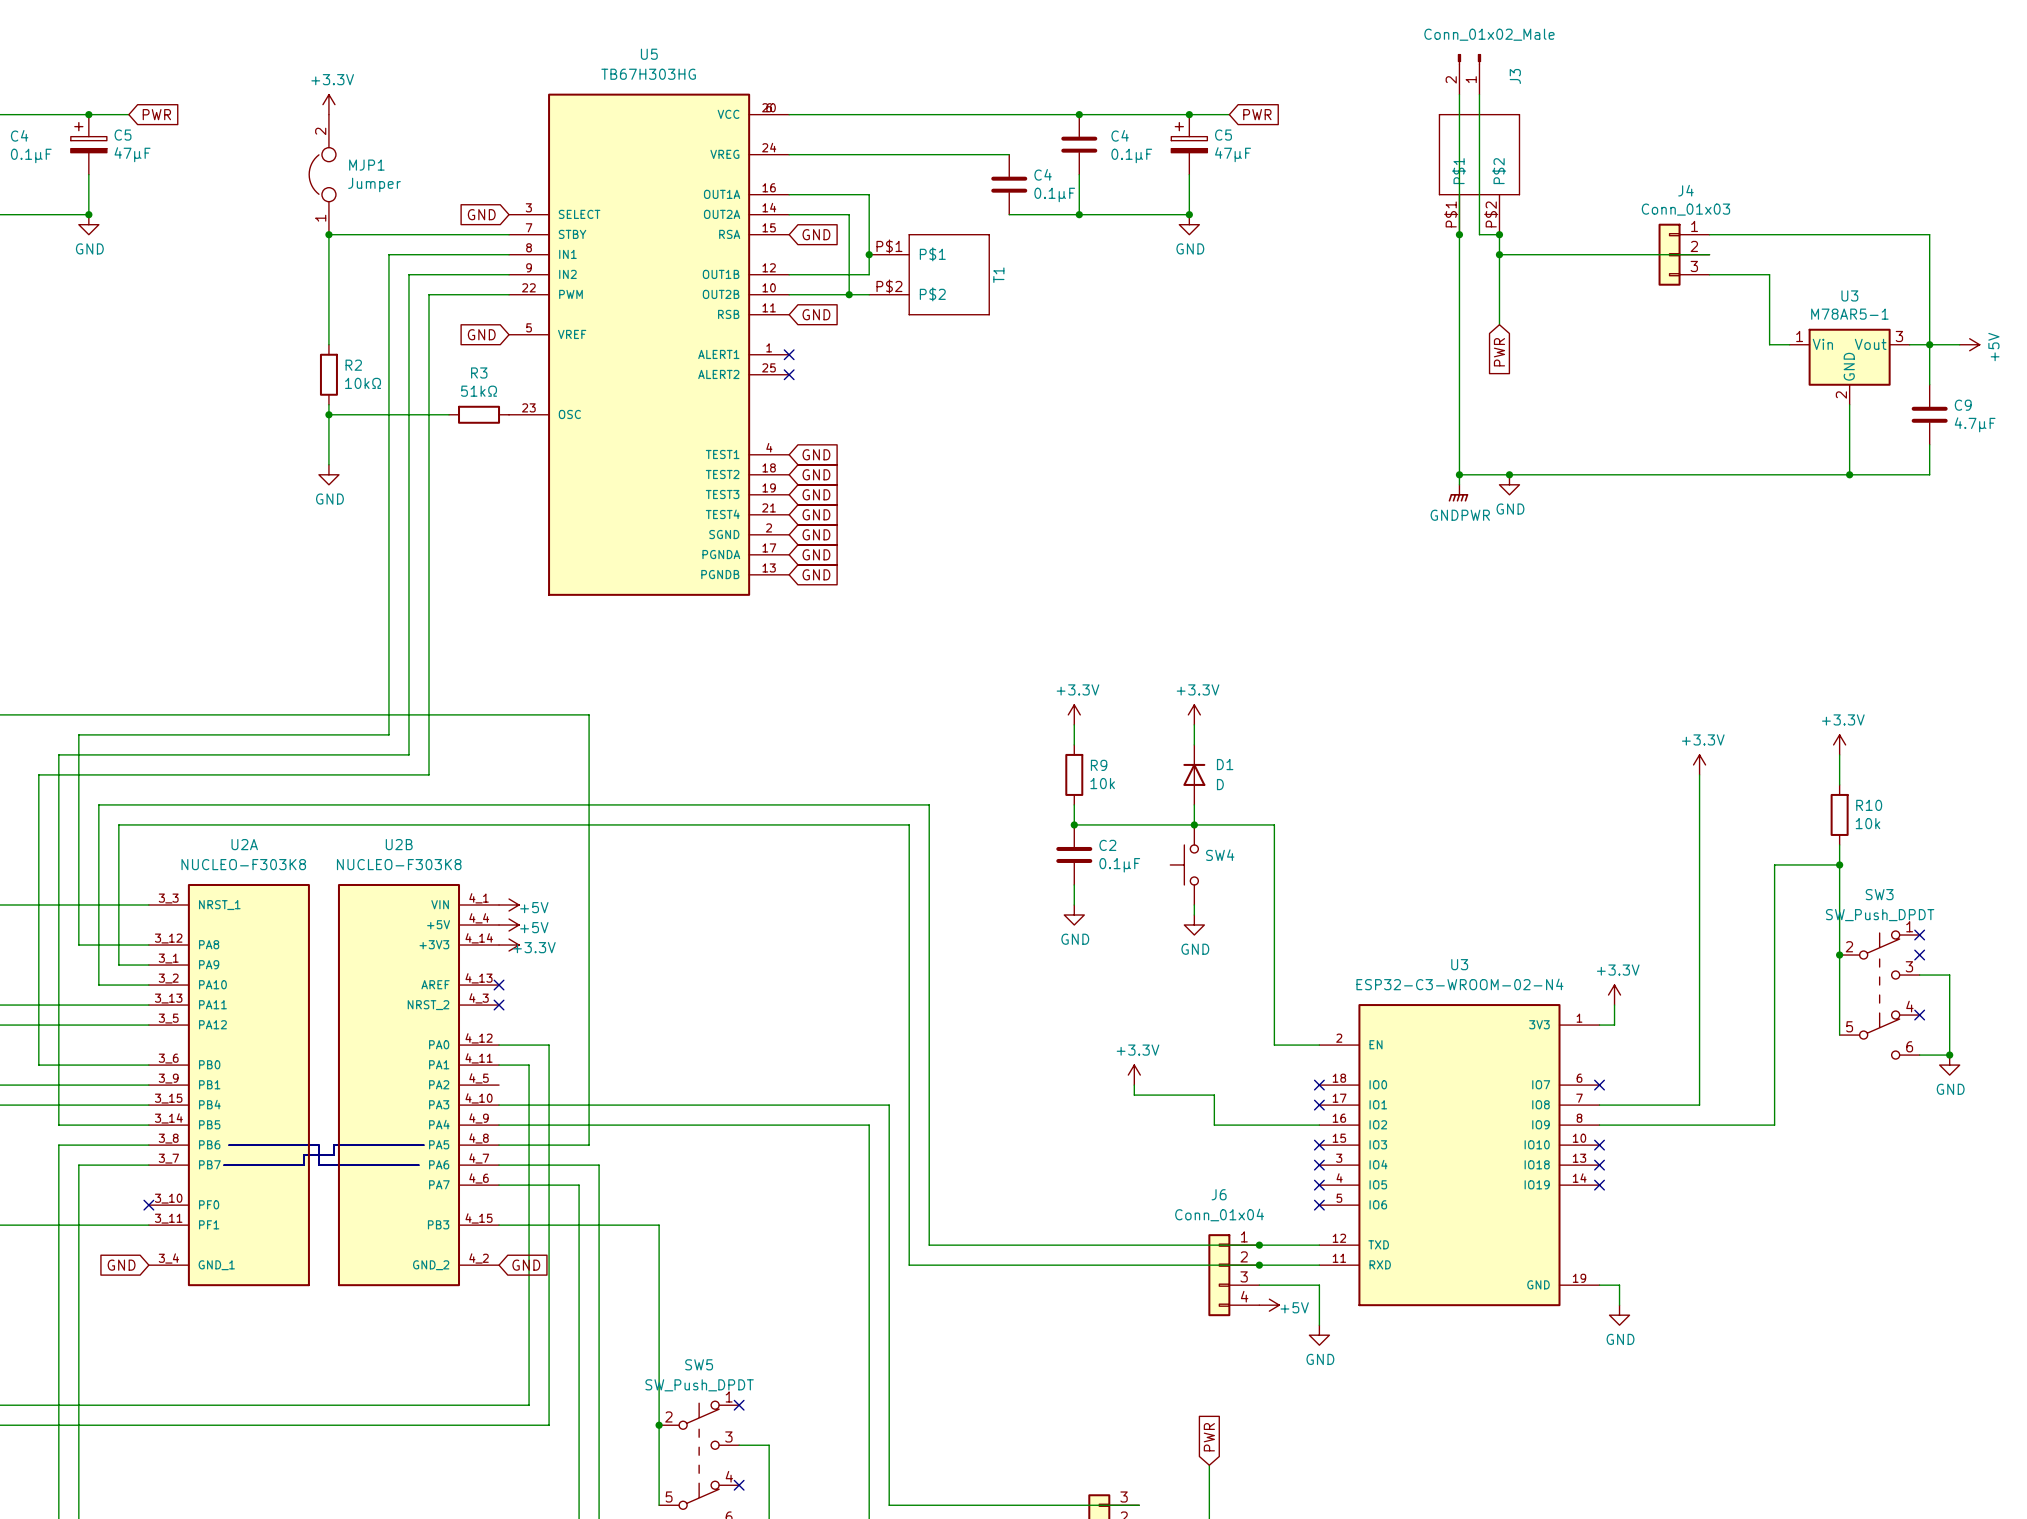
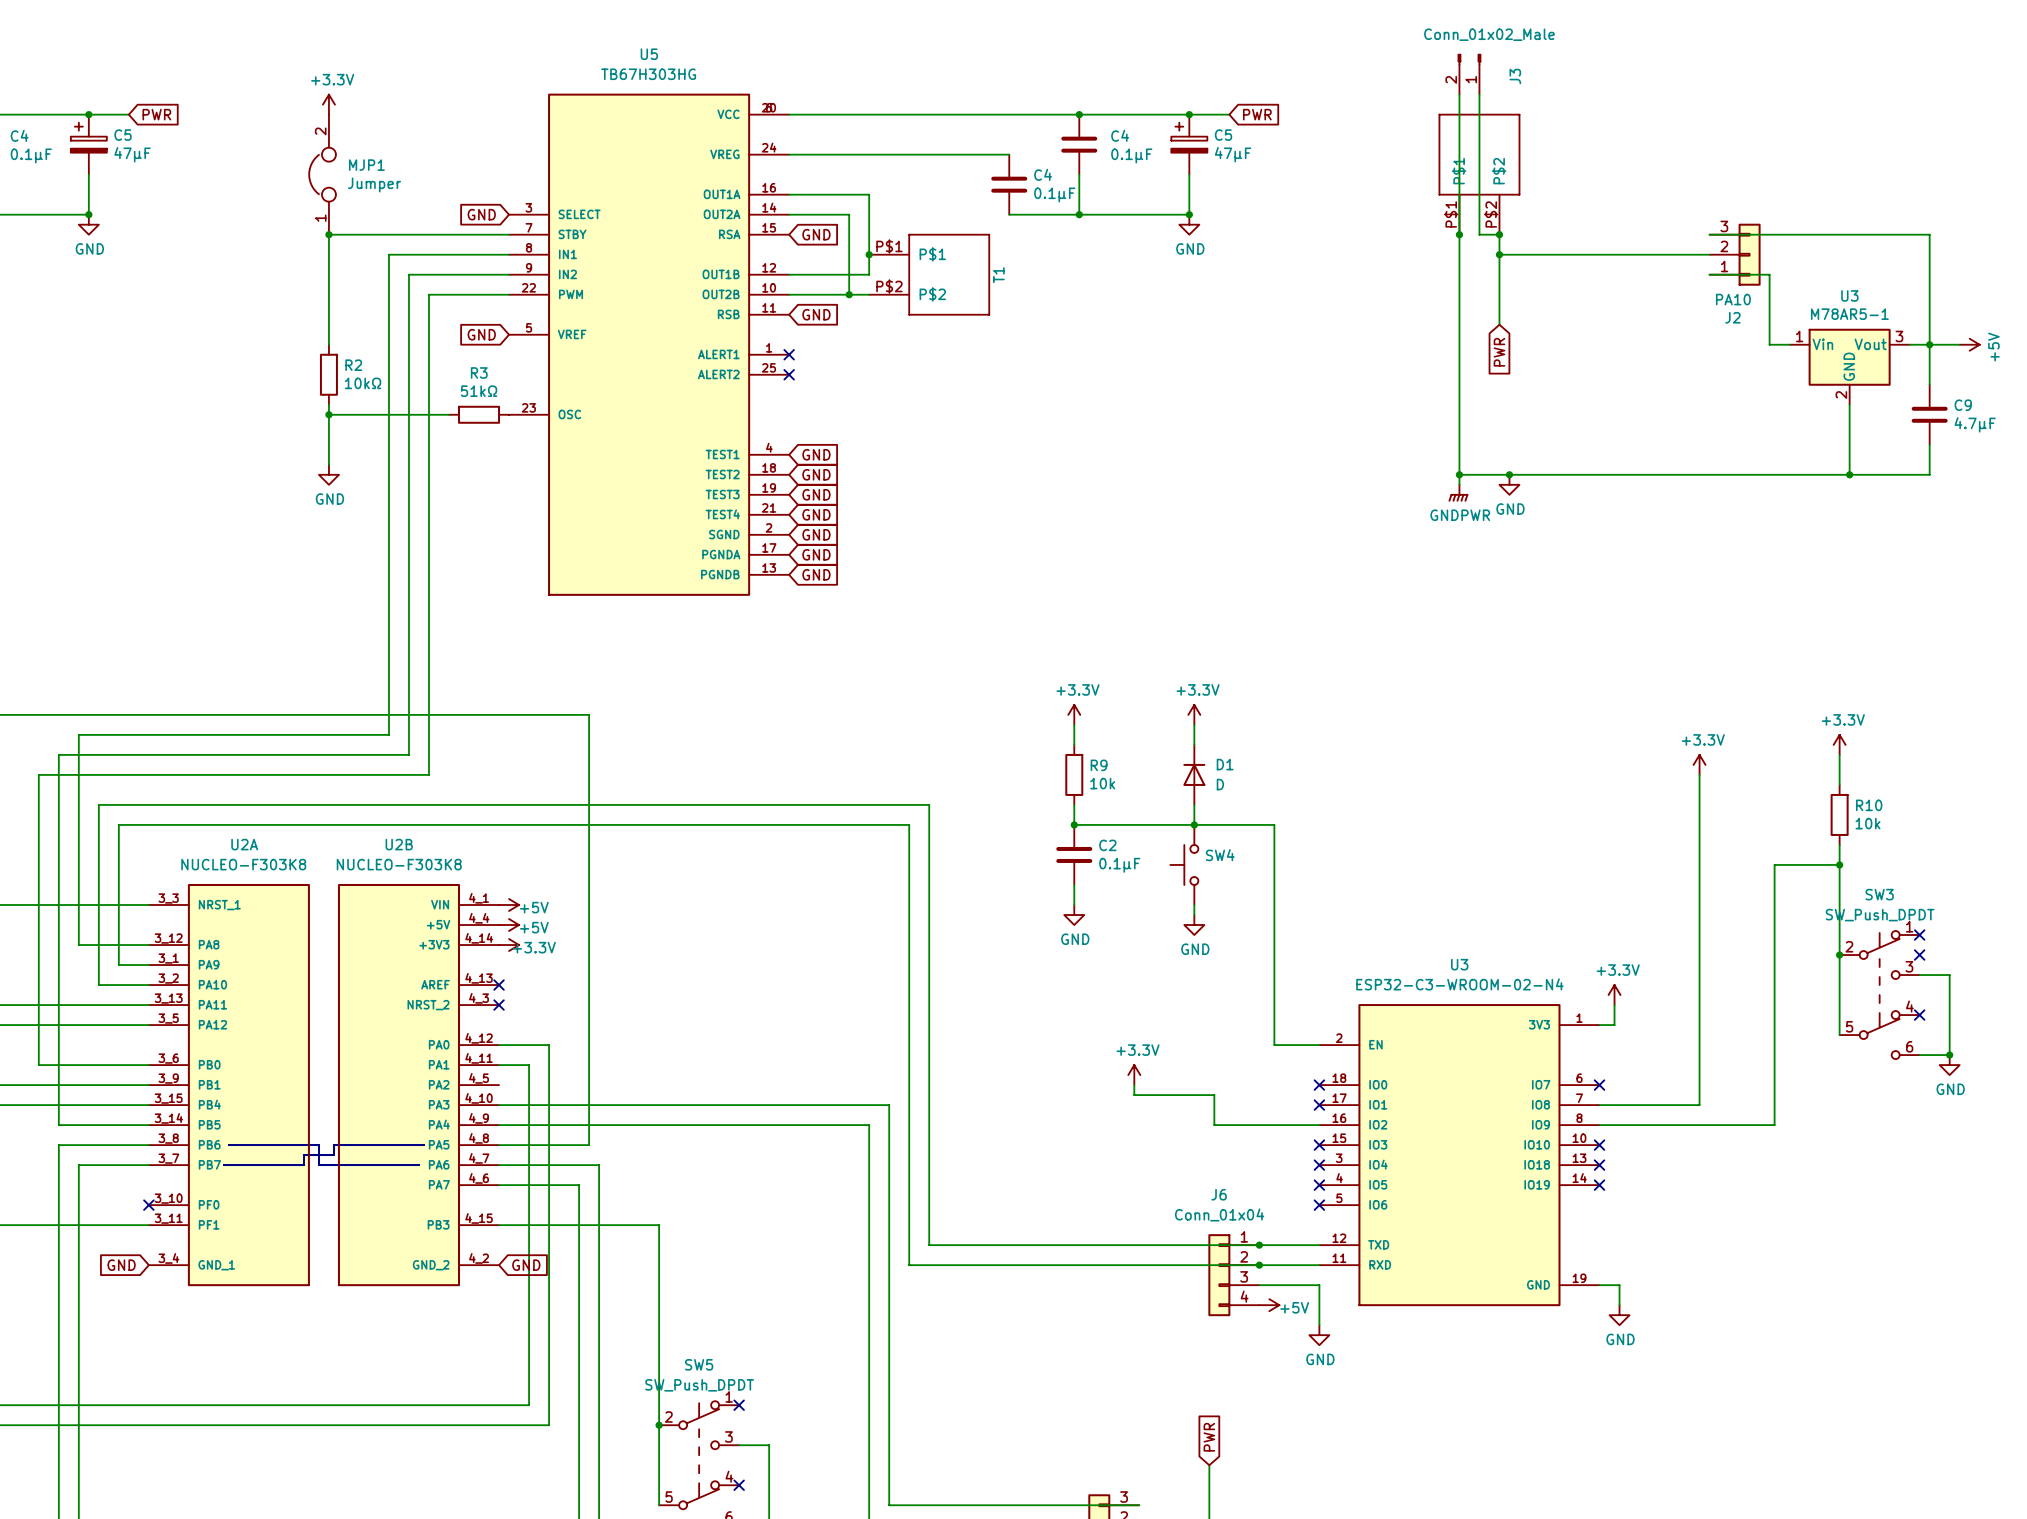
J4: Conn_01x03 (1684, 254) -> none
J2: none -> PA10 (1735, 254)

